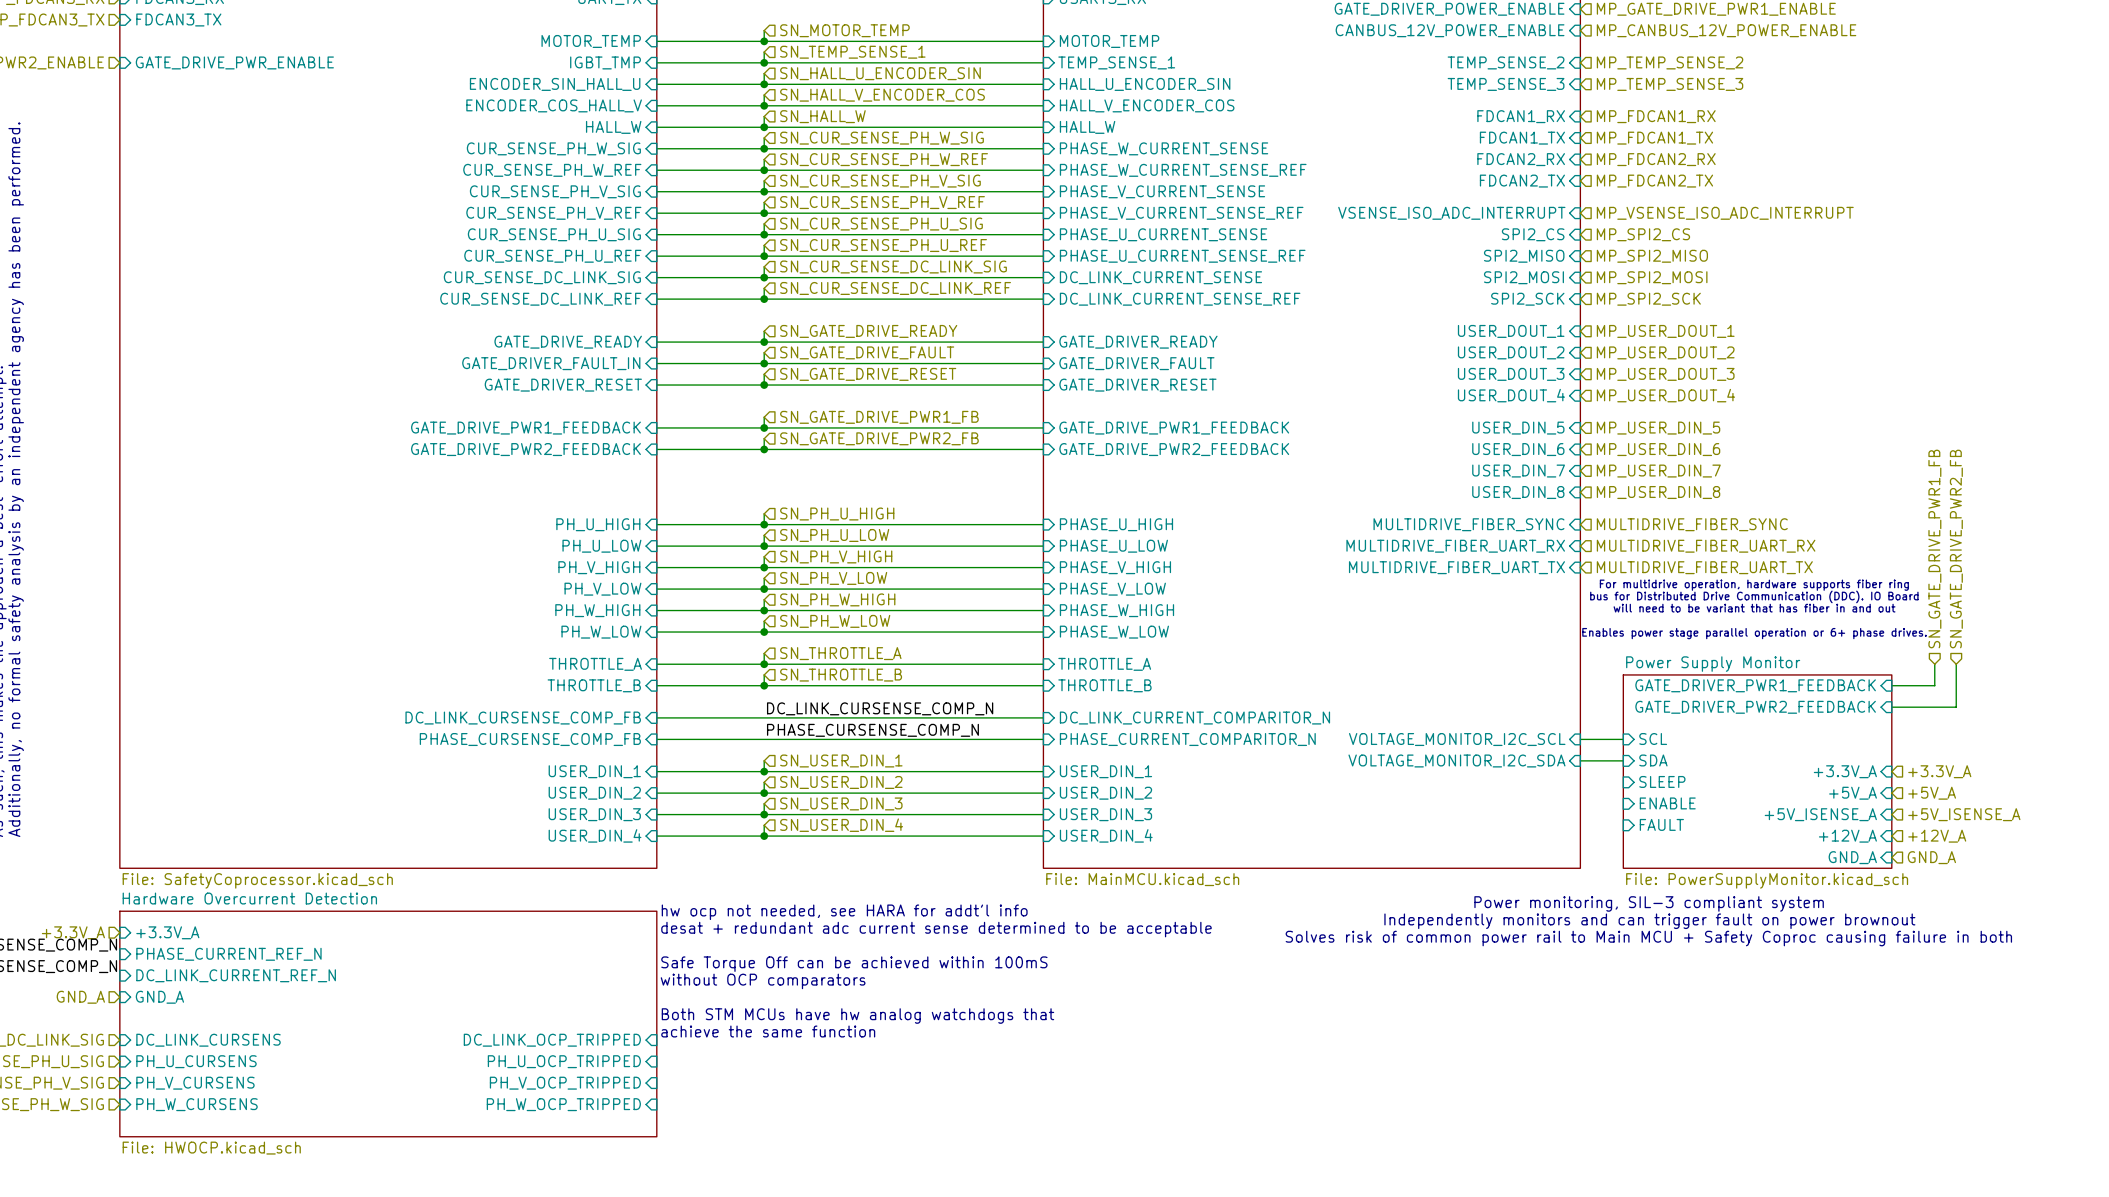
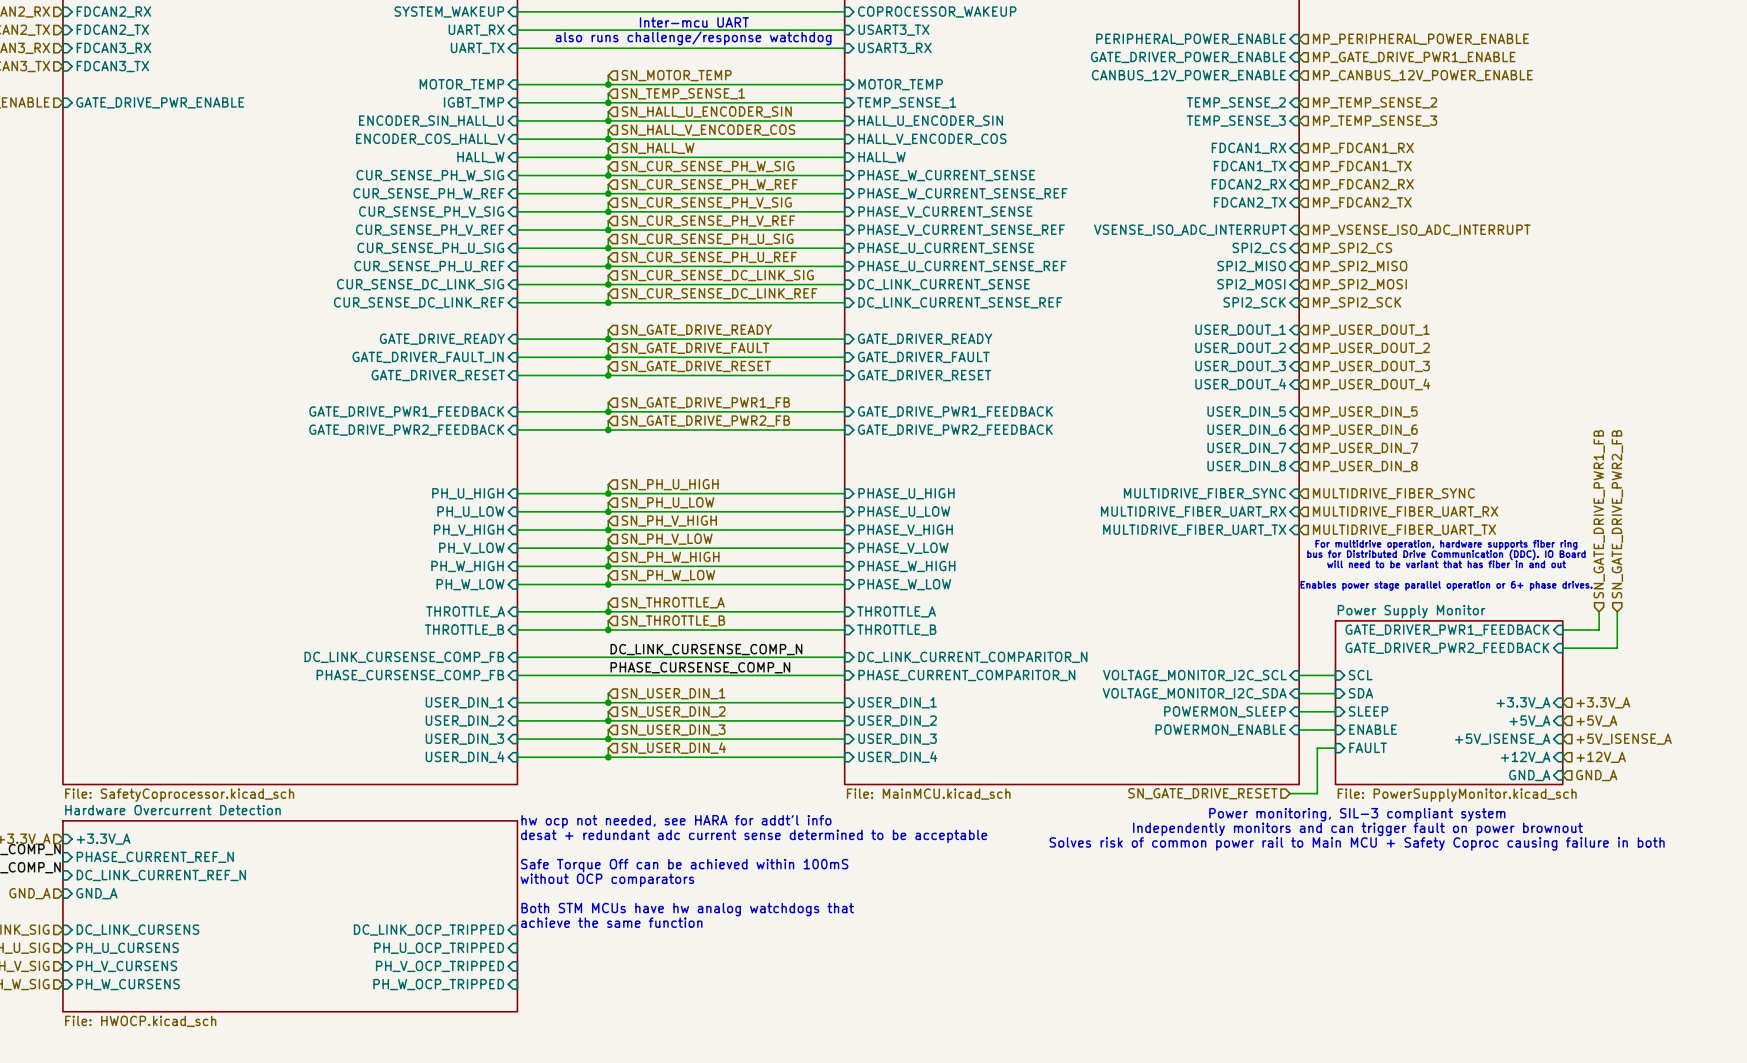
sheet pin: none -> POWERMON_SLEEP (1224, 711)
wire: none -> (1299, 711) (1335, 711)
sheet pin: none -> POWERMON_ENABLE (1220, 730)
wire: none -> (1299, 729) (1335, 729)
wire: none -> (1335, 748) (1317, 748) (1317, 793) (1290, 793)
hierarchical label: none -> SN_GATE_DRIVE_RESET (1202, 793)

